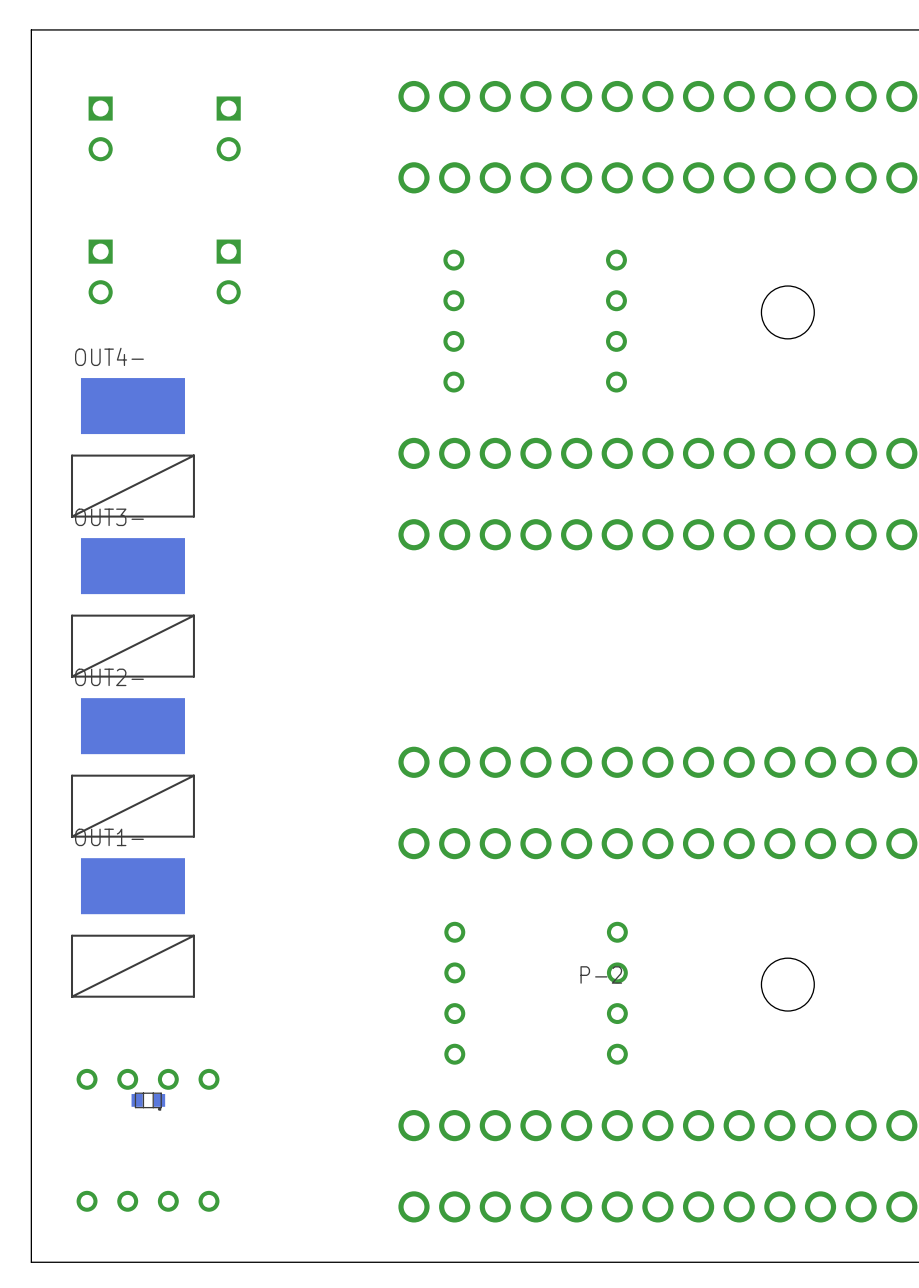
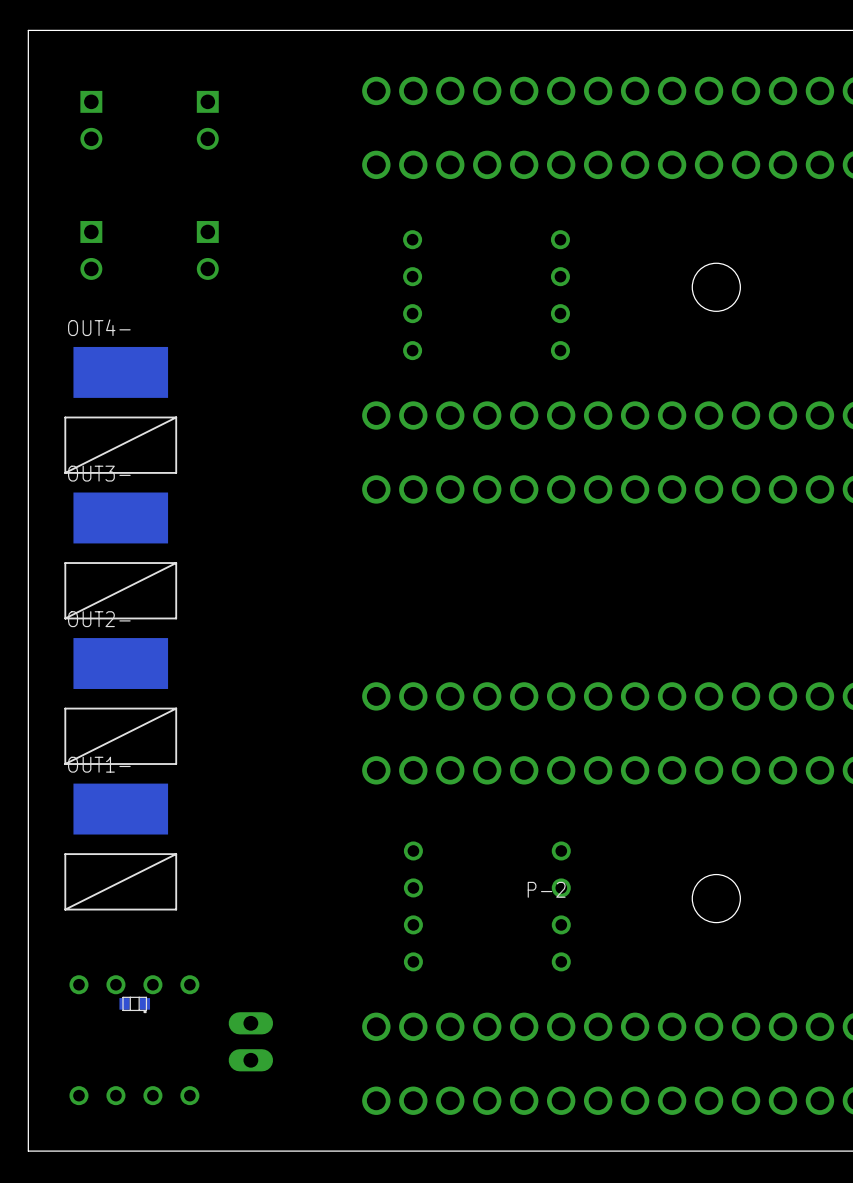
part: none -> (250, 1041)

